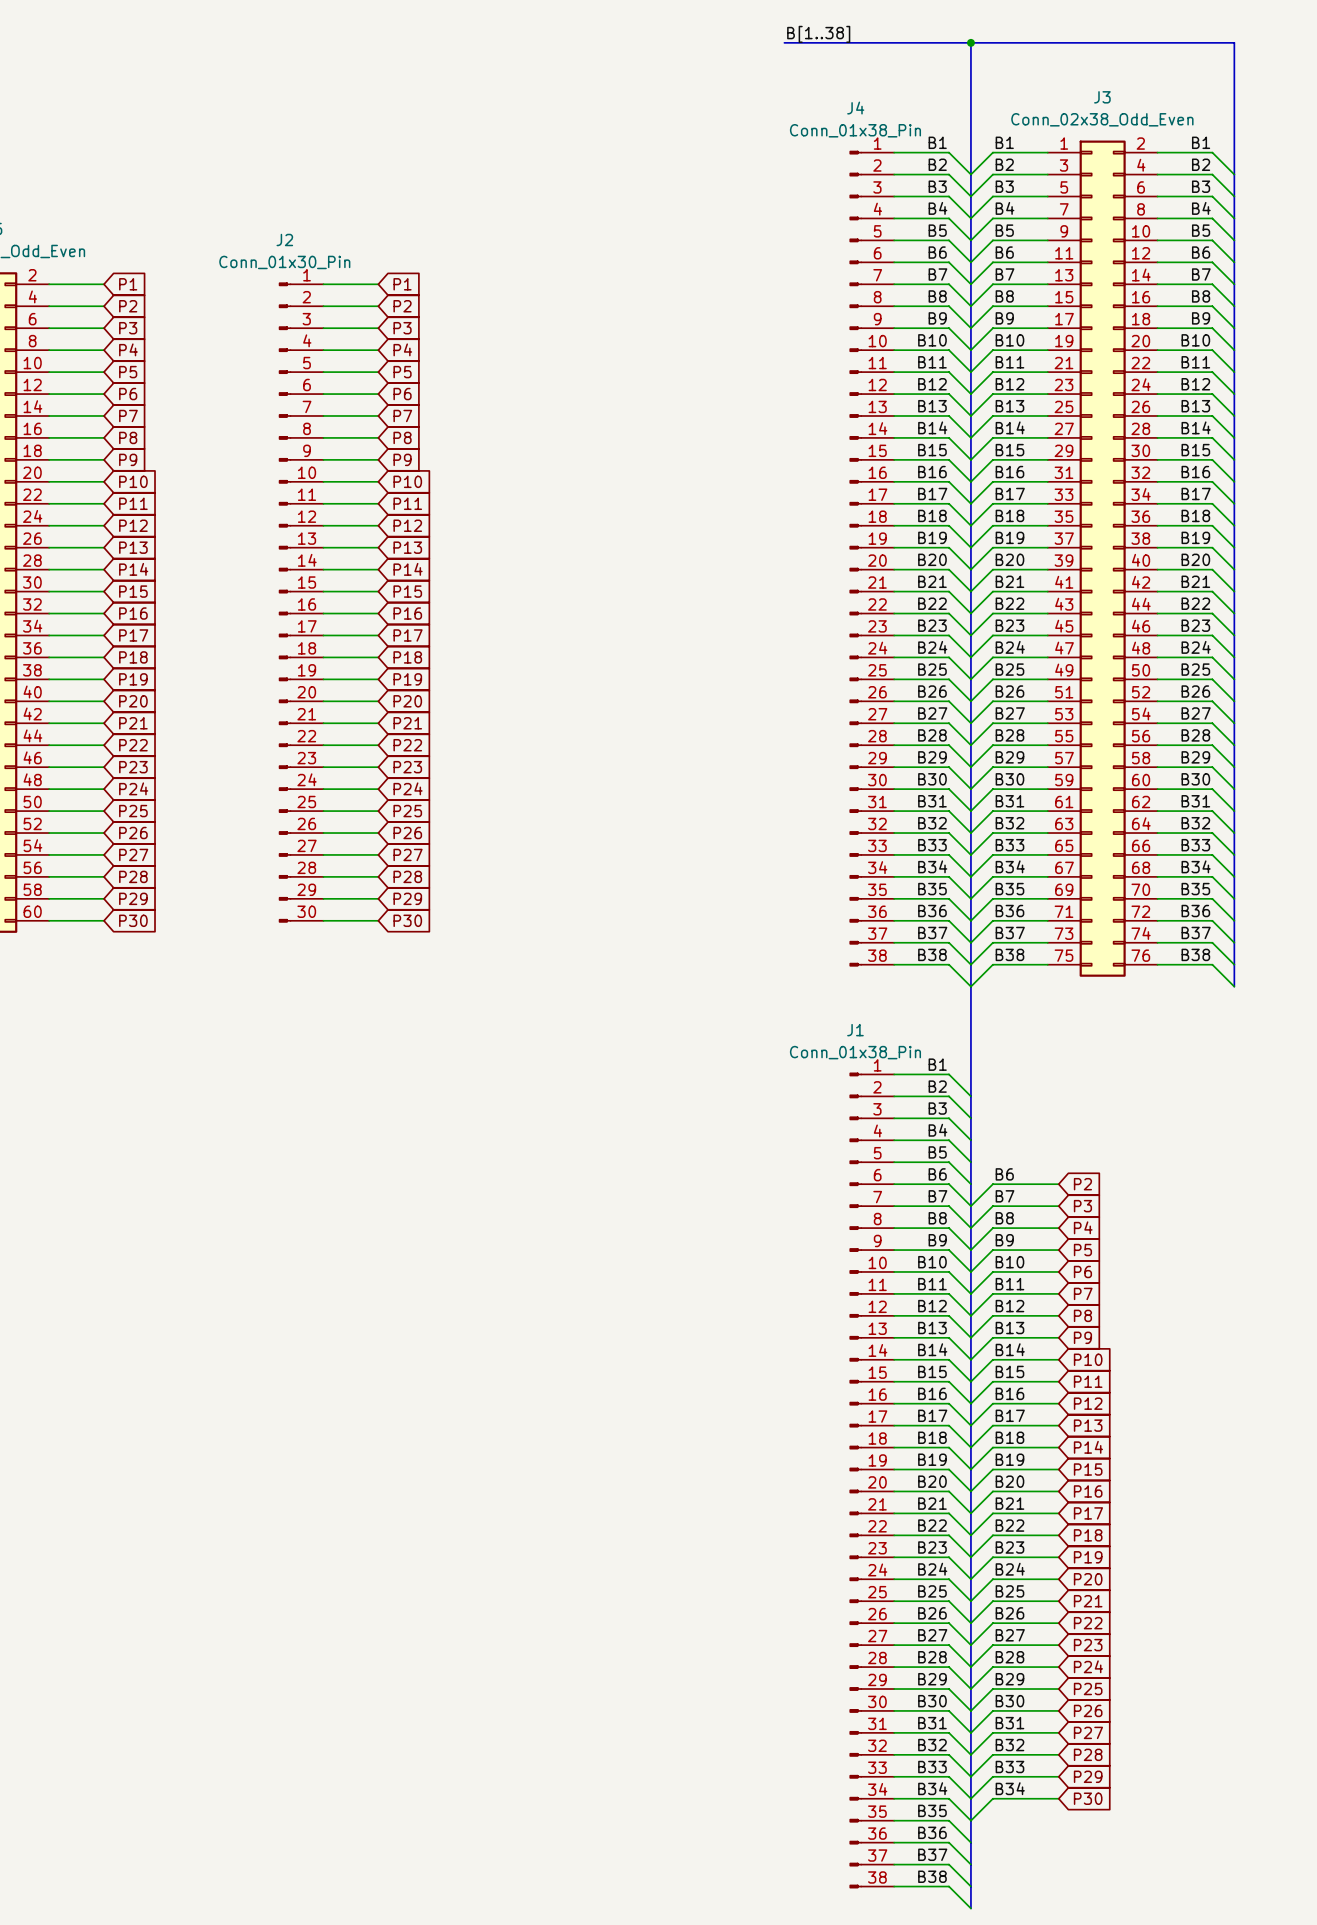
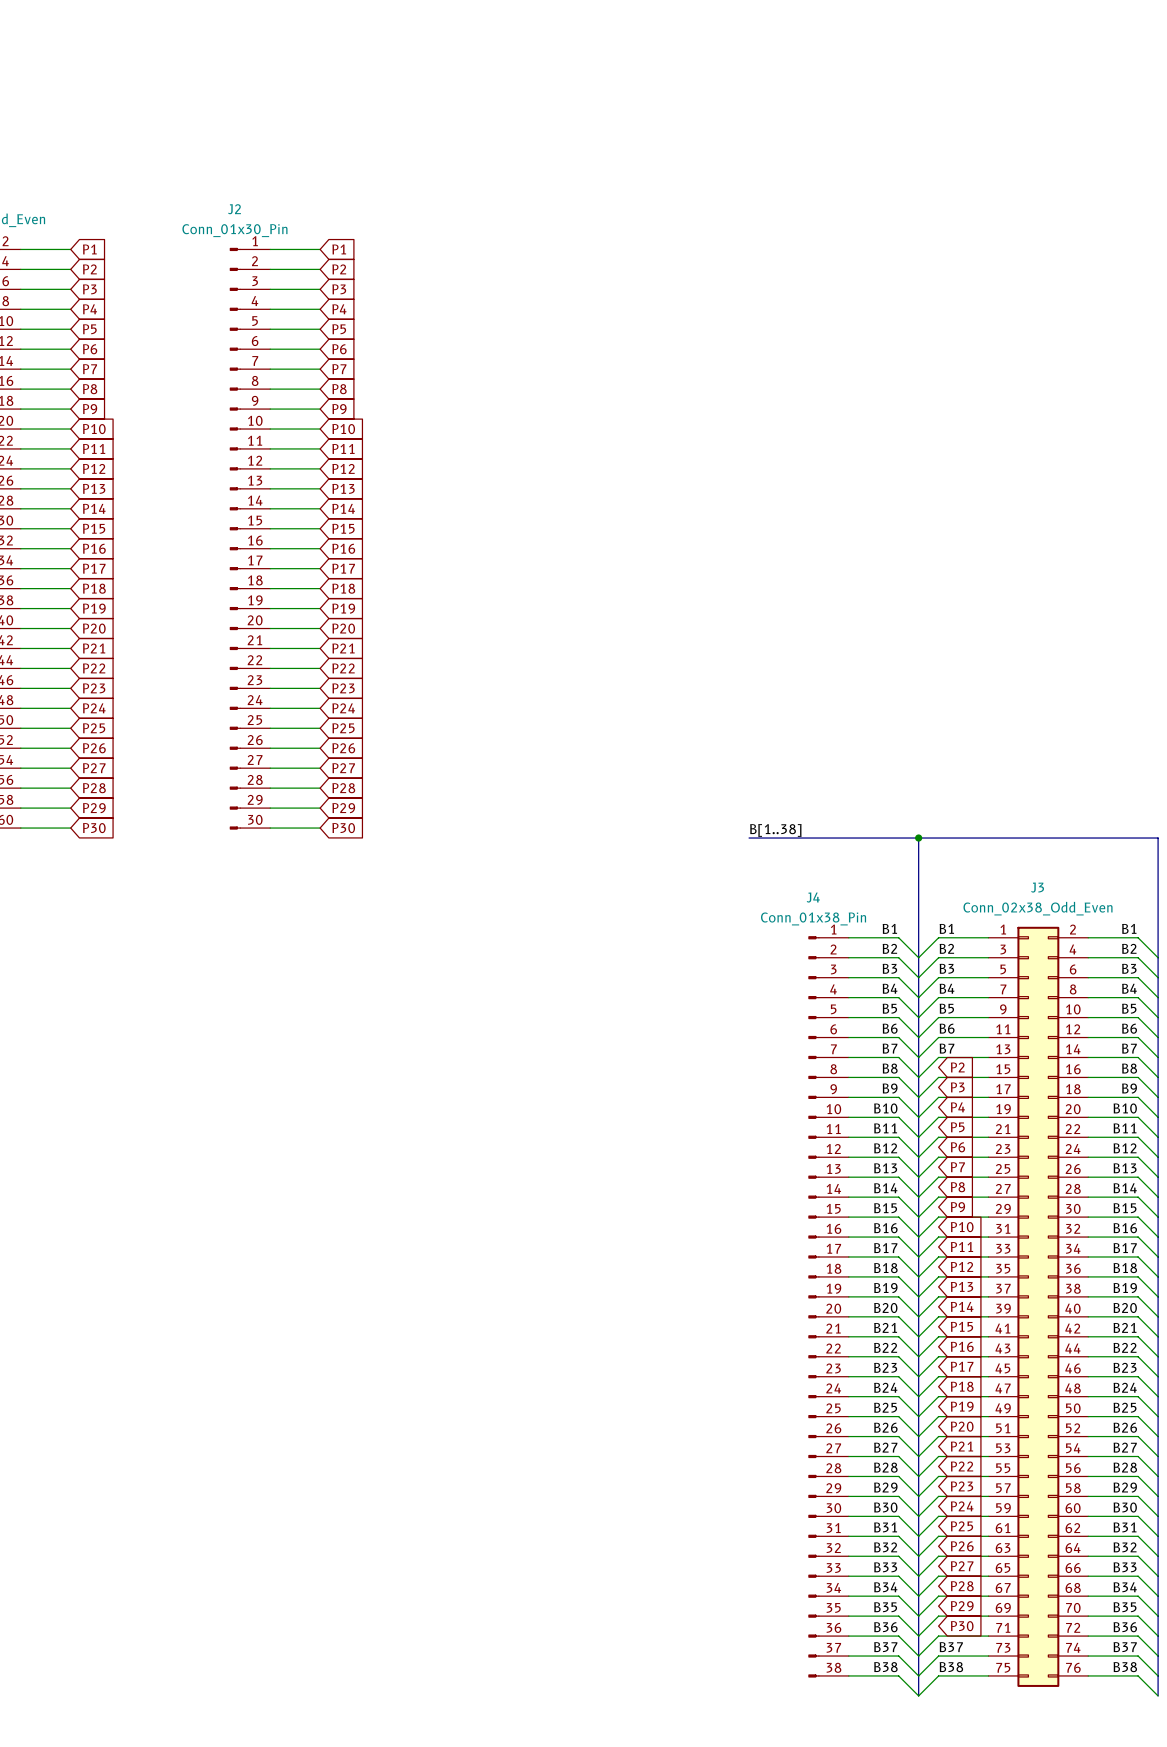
label: B[1..38] (818, 34) -> none
bus: (784, 42) (1234, 42) (1234, 986) -> none
bus: (970, 42) (970, 1908) -> none
junction: (970, 42) -> none
label: B1 (937, 142) -> none
label: B1 (1004, 142) -> none
label: B1 (1201, 142) -> none
wire: (894, 152) (949, 152) (970, 174) (992, 152) (1047, 152) -> none
wire: (1157, 152) (1212, 152) (1234, 174) -> none
label: B2 (937, 164) -> none
label: B2 (1004, 164) -> none
label: B2 (1201, 164) -> none
wire: (894, 174) (949, 174) (970, 196) (992, 174) (1047, 174) -> none
wire: (1157, 174) (1212, 174) (1234, 196) -> none
label: B3 (937, 186) -> none
label: B3 (1004, 186) -> none
label: B3 (1201, 186) -> none
wire: (894, 196) (949, 196) (970, 218) (992, 196) (1047, 196) -> none
wire: (1157, 196) (1212, 196) (1234, 218) -> none
label: B4 (937, 208) -> none
label: B4 (1005, 208) -> none
label: B4 (1201, 208) -> none
wire: (894, 218) (949, 218) (970, 240) (992, 218) (1047, 218) -> none
wire: (1157, 218) (1212, 218) (1234, 240) -> none
label: B5 (937, 230) -> none
label: B5 (1004, 230) -> none
label: B5 (1201, 230) -> none
wire: (894, 240) (949, 240) (970, 262) (992, 240) (1047, 240) -> none
wire: (1157, 240) (1212, 240) (1234, 262) -> none
label: B6 (937, 252) -> none
label: B6 (1004, 252) -> none
label: B6 (1201, 252) -> none
wire: (894, 262) (949, 262) (970, 284) (992, 262) (1047, 262) -> none
wire: (1157, 262) (1212, 262) (1234, 284) -> none
label: B7 (937, 274) -> none
label: B7 (1005, 274) -> none
label: B7 (1201, 274) -> none
wire: (894, 284) (949, 284) (970, 306) (992, 284) (1047, 284) -> none
wire: (1157, 284) (1212, 284) (1234, 306) -> none
label: B8 (937, 296) -> none
label: B8 (1004, 296) -> none
label: B8 (1201, 296) -> none
wire: (894, 306) (949, 306) (970, 328) (992, 306) (1047, 306) -> none
wire: (1157, 306) (1212, 306) (1234, 328) -> none
label: B9 (937, 318) -> none
label: B9 (1004, 318) -> none
label: B9 (1201, 318) -> none
wire: (894, 328) (949, 328) (970, 350) (992, 328) (1047, 328) -> none
wire: (1157, 328) (1212, 328) (1234, 350) -> none
label: B10 (932, 340) -> none
label: B10 (1009, 340) -> none
label: B10 (1195, 340) -> none
wire: (894, 350) (949, 350) (970, 372) (992, 350) (1047, 350) -> none
wire: (1157, 350) (1212, 350) (1234, 372) -> none
label: B11 (932, 362) -> none
label: B11 (1009, 362) -> none
label: B11 (1195, 362) -> none
wire: (894, 372) (949, 372) (970, 394) (992, 372) (1047, 372) -> none
wire: (1157, 372) (1212, 372) (1234, 394) -> none
label: B12 (932, 384) -> none
label: B12 (1009, 384) -> none
label: B12 (1195, 384) -> none
wire: (894, 394) (949, 394) (970, 415) (992, 394) (1047, 394) -> none
wire: (1157, 394) (1212, 394) (1234, 415) -> none
label: B13 (932, 406) -> none
label: B13 (1009, 406) -> none
label: B13 (1195, 406) -> none
wire: (894, 415) (949, 415) (970, 437) (992, 415) (1047, 415) -> none
wire: (1157, 415) (1212, 415) (1234, 437) -> none
label: B14 (932, 427) -> none
label: B14 (1010, 427) -> none
label: B14 (1196, 427) -> none
wire: (894, 437) (949, 437) (970, 459) (992, 437) (1047, 437) -> none
wire: (1157, 437) (1212, 437) (1234, 459) -> none
label: B15 (932, 450) -> none
label: B15 (1009, 450) -> none
label: B15 (1195, 450) -> none
wire: (894, 459) (949, 459) (970, 481) (992, 459) (1047, 459) -> none
wire: (1157, 459) (1212, 459) (1234, 481) -> none
label: B16 (932, 472) -> none
label: B16 (1009, 472) -> none
label: B16 (1195, 472) -> none
wire: (894, 481) (949, 481) (970, 503) (992, 481) (1047, 481) -> none
wire: (1157, 481) (1212, 481) (1234, 503) -> none
label: B17 (932, 493) -> none
label: B17 (1010, 493) -> none
label: B17 (1196, 493) -> none
wire: (894, 503) (949, 503) (970, 525) (992, 503) (1047, 503) -> none
wire: (1157, 503) (1212, 503) (1234, 525) -> none
label: B18 (932, 515) -> none
label: B18 (1009, 515) -> none
label: B18 (1195, 515) -> none
wire: (894, 525) (949, 525) (970, 547) (992, 525) (1047, 525) -> none
wire: (1157, 525) (1212, 525) (1234, 547) -> none
label: B19 (932, 537) -> none
label: B19 (1009, 537) -> none
label: B19 (1195, 537) -> none
wire: (894, 547) (949, 547) (970, 569) (992, 547) (1047, 547) -> none
wire: (1157, 547) (1212, 547) (1234, 569) -> none
J4 position: (871, 558) -> (828, 1306)
J3 position: (1102, 558) -> (1038, 1306)
label: B20 (932, 559) -> none
label: B20 (1009, 559) -> none
label: B20 (1195, 559) -> none
wire: (894, 569) (949, 569) (970, 591) (992, 569) (1047, 569) -> none
wire: (1157, 569) (1212, 569) (1234, 591) -> none
label: B21 (932, 581) -> none
label: B21 (1009, 581) -> none
label: B21 (1195, 581) -> none
wire: (894, 591) (949, 591) (970, 613) (992, 591) (1047, 591) -> none
wire: (1157, 591) (1212, 591) (1234, 613) -> none
label: B22 (932, 603) -> none
label: B22 (1009, 603) -> none
label: B22 (1195, 603) -> none
wire: (894, 613) (949, 613) (970, 635) (992, 613) (1047, 613) -> none
wire: (1157, 613) (1212, 613) (1234, 635) -> none
label: B23 (932, 625) -> none
label: B23 (1009, 625) -> none
label: B23 (1195, 625) -> none
wire: (894, 635) (949, 635) (970, 657) (992, 635) (1047, 635) -> none
wire: (1157, 635) (1212, 635) (1234, 657) -> none
label: B24 (932, 647) -> none
label: B24 (1010, 647) -> none
label: B24 (1196, 647) -> none
wire: (894, 657) (949, 657) (970, 679) (992, 657) (1047, 657) -> none
wire: (1157, 657) (1212, 657) (1234, 679) -> none
label: B25 (932, 669) -> none
label: B25 (1009, 669) -> none
label: B25 (1195, 669) -> none
wire: (894, 679) (949, 679) (970, 701) (992, 679) (1047, 679) -> none
wire: (1157, 679) (1212, 679) (1234, 701) -> none
label: B26 (932, 691) -> none
label: B26 (1009, 691) -> none
label: B26 (1195, 691) -> none
wire: (894, 701) (949, 701) (970, 723) (992, 701) (1047, 701) -> none
wire: (1157, 701) (1212, 701) (1234, 723) -> none
label: B27 (932, 713) -> none
label: B27 (1010, 713) -> none
label: B27 (1196, 713) -> none
wire: (894, 723) (949, 723) (970, 745) (992, 723) (1047, 723) -> none
wire: (1157, 723) (1212, 723) (1234, 745) -> none
label: B28 (932, 735) -> none
label: B28 (1009, 735) -> none
label: B28 (1195, 735) -> none
wire: (894, 745) (949, 745) (970, 767) (992, 745) (1047, 745) -> none
wire: (1157, 745) (1212, 745) (1234, 767) -> none
label: B29 (932, 757) -> none
label: B29 (1009, 757) -> none
label: B29 (1195, 757) -> none
wire: (894, 767) (949, 767) (970, 789) (992, 767) (1047, 767) -> none
wire: (1157, 767) (1212, 767) (1234, 789) -> none
label: B30 (932, 779) -> none
label: B30 (1009, 779) -> none
label: B30 (1195, 779) -> none
wire: (894, 789) (949, 789) (970, 811) (992, 789) (1047, 789) -> none
wire: (1157, 789) (1212, 789) (1234, 811) -> none
label: B31 (932, 801) -> none
label: B31 (1009, 801) -> none
label: B31 (1195, 801) -> none
wire: (894, 811) (949, 811) (970, 833) (992, 811) (1047, 811) -> none
wire: (1157, 811) (1212, 811) (1234, 833) -> none
label: B32 (932, 823) -> none
label: B32 (1009, 823) -> none
label: B32 (1195, 823) -> none
wire: (894, 833) (949, 833) (970, 854) (992, 833) (1047, 833) -> none
wire: (1157, 833) (1212, 833) (1234, 854) -> none
label: B33 (932, 845) -> none
label: B33 (1009, 845) -> none
label: B33 (1195, 845) -> none
wire: (894, 854) (949, 854) (970, 876) (992, 854) (1047, 854) -> (848, 937) (898, 937) (918, 957) (938, 937) (988, 937)
wire: (1157, 854) (1212, 854) (1234, 876) -> (1088, 937) (1138, 937) (1158, 957)
label: B34 (932, 866) -> none
label: B34 (1010, 866) -> none
label: B34 (1196, 866) -> none
wire: (894, 876) (949, 876) (970, 898) (992, 876) (1047, 876) -> (848, 957) (898, 957) (918, 977) (938, 957) (988, 957)
wire: (1157, 876) (1212, 876) (1234, 898) -> (1088, 957) (1138, 957) (1158, 977)
label: B35 (932, 889) -> none
label: B35 (1009, 889) -> none
label: B35 (1195, 889) -> none
wire: (894, 898) (949, 898) (970, 920) (992, 898) (1047, 898) -> (848, 977) (898, 977) (918, 997) (938, 977) (988, 977)
wire: (1157, 898) (1212, 898) (1234, 920) -> (1088, 977) (1138, 977) (1158, 997)
label: B36 (932, 911) -> none
label: B36 (1009, 911) -> none
label: B36 (1195, 911) -> none
wire: (894, 920) (949, 920) (970, 942) (992, 920) (1047, 920) -> (848, 997) (898, 997) (918, 1017) (938, 997) (988, 997)
wire: (1157, 920) (1212, 920) (1234, 942) -> (1088, 997) (1138, 997) (1158, 1017)
label: none -> B[1..38] (775, 830)
bus: none -> (749, 838) (1158, 838) (1158, 1695)
bus: none -> (918, 838) (918, 1695)
junction: none -> (918, 838)
label: B37 (932, 932) -> none
label: B37 (1010, 932) -> none
label: B37 (1196, 932) -> none
wire: (894, 942) (949, 942) (970, 964) (992, 942) (1047, 942) -> (848, 1017) (898, 1017) (918, 1037) (938, 1017) (988, 1017)
wire: (1157, 942) (1212, 942) (1234, 964) -> (1088, 1017) (1138, 1017) (1158, 1037)
label: B38 (932, 954) -> none
label: B38 (1009, 954) -> none
label: B38 (1195, 954) -> none
wire: (894, 964) (949, 964) (970, 986) (992, 964) (1047, 964) -> (848, 1037) (898, 1037) (918, 1057) (938, 1037) (988, 1037)
wire: (1157, 964) (1212, 964) (1234, 986) -> (1088, 1037) (1138, 1037) (1158, 1057)
label: none -> B1 (889, 928)
label: none -> B1 (946, 928)
label: none -> B1 (1129, 928)
label: none -> B2 (889, 948)
label: none -> B2 (946, 948)
label: none -> B2 (1129, 948)
label: B1 (937, 1064) -> none
wire: (894, 1074) (949, 1074) (970, 1096) -> none
label: none -> B3 (889, 968)
label: none -> B3 (946, 968)
label: none -> B3 (1129, 968)
label: B2 (937, 1086) -> none
wire: (894, 1096) (949, 1096) (970, 1118) -> none
label: none -> B4 (890, 988)
label: none -> B4 (947, 988)
label: none -> B4 (1129, 988)
label: B3 (937, 1108) -> none
wire: (894, 1118) (949, 1118) (970, 1140) -> none
label: none -> B5 (889, 1008)
label: none -> B5 (946, 1008)
label: none -> B5 (1129, 1008)
label: B4 (937, 1130) -> none
wire: (894, 1140) (949, 1140) (970, 1162) -> none
label: none -> B6 (890, 1028)
label: none -> B6 (947, 1028)
label: none -> B6 (1129, 1028)
label: B5 (937, 1152) -> none
wire: (894, 1162) (949, 1162) (970, 1184) -> none
label: none -> B7 (890, 1048)
label: none -> B7 (947, 1048)
label: none -> B7 (1129, 1048)
wire: none -> (848, 1057) (898, 1057) (918, 1077) (938, 1057) (988, 1057)
wire: none -> (1088, 1057) (1138, 1057) (1158, 1077)
label: B6 (937, 1174) -> none
label: B6 (1004, 1174) -> none
wire: (894, 1184) (949, 1184) (970, 1206) (992, 1184) (1058, 1184) -> none
label: none -> B8 (890, 1068)
label: none -> B8 (1129, 1068)
wire: none -> (848, 1077) (898, 1077) (918, 1097) (938, 1077) (988, 1077)
wire: none -> (1088, 1077) (1138, 1077) (1158, 1097)
label: B7 (937, 1196) -> none
label: B7 (1005, 1196) -> none
wire: (894, 1206) (949, 1206) (970, 1228) (992, 1206) (1058, 1206) -> none
label: none -> B9 (890, 1088)
label: none -> B9 (1129, 1088)
wire: none -> (848, 1097) (898, 1097) (918, 1117) (938, 1097) (988, 1097)
wire: none -> (1088, 1097) (1138, 1097) (1158, 1117)
label: B8 (937, 1218) -> none
label: B8 (1004, 1218) -> none
wire: (894, 1228) (949, 1228) (970, 1250) (992, 1228) (1058, 1228) -> none
label: none -> B10 (885, 1108)
label: none -> B10 (1125, 1108)
wire: none -> (848, 1117) (898, 1117) (918, 1137) (938, 1117) (988, 1117)
wire: none -> (1088, 1117) (1138, 1117) (1158, 1137)
label: B9 (937, 1240) -> none
label: B9 (1004, 1240) -> none
wire: (894, 1250) (949, 1250) (970, 1271) (992, 1250) (1058, 1250) -> none
label: none -> B11 (885, 1128)
label: none -> B11 (1125, 1128)
wire: none -> (848, 1137) (898, 1137) (918, 1157) (938, 1137) (988, 1137)
wire: none -> (1088, 1137) (1138, 1137) (1158, 1157)
label: B10 (932, 1262) -> none
label: B10 (1009, 1262) -> none
wire: (894, 1271) (949, 1271) (970, 1293) (992, 1271) (1058, 1271) -> none
label: none -> B12 (885, 1148)
label: none -> B12 (1125, 1148)
wire: none -> (848, 1157) (898, 1157) (918, 1177) (938, 1157) (988, 1157)
wire: none -> (1088, 1157) (1138, 1157) (1158, 1177)
label: B11 (932, 1284) -> none
label: B11 (1009, 1284) -> none
wire: (894, 1293) (949, 1293) (970, 1315) (992, 1293) (1058, 1293) -> none
label: none -> B13 (885, 1168)
label: none -> B13 (1125, 1168)
wire: none -> (848, 1177) (898, 1177) (918, 1197) (938, 1177) (988, 1177)
wire: none -> (1088, 1177) (1138, 1177) (1158, 1197)
label: B12 (932, 1306) -> none
label: B12 (1009, 1306) -> none
wire: (894, 1315) (949, 1315) (970, 1337) (992, 1315) (1058, 1315) -> none
label: none -> B14 (885, 1188)
label: none -> B14 (1125, 1188)
wire: none -> (848, 1197) (898, 1197) (918, 1217) (938, 1197) (988, 1197)
wire: none -> (1088, 1197) (1138, 1197) (1158, 1217)
label: B13 (932, 1328) -> none
label: B13 (1009, 1328) -> none
wire: (894, 1337) (949, 1337) (970, 1359) (992, 1337) (1058, 1337) -> none
label: none -> B15 (885, 1208)
label: none -> B15 (1125, 1208)
wire: none -> (848, 1217) (898, 1217) (918, 1237) (938, 1217) (988, 1217)
wire: none -> (1088, 1217) (1138, 1217) (1158, 1237)
label: B14 (932, 1349) -> none
label: B14 (1010, 1349) -> none
wire: (894, 1359) (949, 1359) (970, 1381) (992, 1359) (1058, 1359) -> none
label: none -> B16 (885, 1228)
label: none -> B16 (1125, 1228)
wire: none -> (848, 1237) (898, 1237) (918, 1256) (938, 1237) (988, 1237)
wire: none -> (1088, 1237) (1138, 1237) (1158, 1256)
label: B15 (932, 1371) -> none
label: B15 (1009, 1371) -> none
wire: (894, 1381) (949, 1381) (970, 1403) (992, 1381) (1058, 1381) -> none
label: none -> B17 (885, 1248)
label: none -> B17 (1125, 1248)
wire: none -> (848, 1256) (898, 1256) (918, 1276) (938, 1256) (988, 1256)
wire: none -> (1088, 1256) (1138, 1256) (1158, 1276)
label: B16 (932, 1393) -> none
label: B16 (1009, 1393) -> none
wire: (894, 1403) (949, 1403) (970, 1425) (992, 1403) (1058, 1403) -> none
label: none -> B18 (885, 1268)
label: none -> B18 (1125, 1268)
wire: none -> (848, 1276) (898, 1276) (918, 1296) (938, 1276) (988, 1276)
wire: none -> (1088, 1276) (1138, 1276) (1158, 1296)
label: B17 (932, 1415) -> none
label: B17 (1010, 1415) -> none
wire: (894, 1425) (949, 1425) (970, 1447) (992, 1425) (1058, 1425) -> none
label: none -> B19 (885, 1288)
label: none -> B19 (1125, 1288)
wire: none -> (848, 1296) (898, 1296) (918, 1316) (938, 1296) (988, 1296)
wire: none -> (1088, 1296) (1138, 1296) (1158, 1316)
label: B18 (932, 1437) -> none
label: B18 (1009, 1437) -> none
wire: (894, 1447) (949, 1447) (970, 1469) (992, 1447) (1058, 1447) -> none
label: none -> B20 (885, 1308)
label: none -> B20 (1125, 1308)
wire: none -> (848, 1316) (898, 1316) (918, 1336) (938, 1316) (988, 1316)
wire: none -> (1088, 1316) (1138, 1316) (1158, 1336)
label: B19 (932, 1459) -> none
label: B19 (1009, 1459) -> none
wire: (894, 1469) (949, 1469) (970, 1491) (992, 1469) (1058, 1469) -> none
label: none -> B21 (885, 1327)
label: none -> B21 (1125, 1327)
J1: Conn_01x38_Pin (871, 1480) -> none
wire: none -> (848, 1336) (898, 1336) (918, 1356) (938, 1336) (988, 1336)
wire: none -> (1088, 1336) (1138, 1336) (1158, 1356)
label: B20 (932, 1481) -> none
label: B20 (1009, 1481) -> none
wire: (894, 1491) (949, 1491) (970, 1513) (992, 1491) (1058, 1491) -> none
label: none -> B22 (885, 1347)
label: none -> B22 (1125, 1347)
wire: none -> (848, 1356) (898, 1356) (918, 1376) (938, 1356) (988, 1356)
wire: none -> (1088, 1356) (1138, 1356) (1158, 1376)
label: B21 (932, 1503) -> none
label: B21 (1009, 1503) -> none
wire: (894, 1513) (949, 1513) (970, 1535) (992, 1513) (1058, 1513) -> none
label: none -> B23 (885, 1367)
label: none -> B23 (1125, 1367)
wire: none -> (848, 1376) (898, 1376) (918, 1396) (938, 1376) (988, 1376)
wire: none -> (1088, 1376) (1138, 1376) (1158, 1396)
label: B22 (932, 1525) -> none
label: B22 (1009, 1525) -> none
wire: (894, 1535) (949, 1535) (970, 1557) (992, 1535) (1058, 1535) -> none
label: none -> B24 (885, 1387)
label: none -> B24 (1125, 1387)
wire: none -> (848, 1396) (898, 1396) (918, 1416) (938, 1396) (988, 1396)
wire: none -> (1088, 1396) (1138, 1396) (1158, 1416)
label: B23 (932, 1547) -> none
label: B23 (1009, 1547) -> none
wire: (894, 1557) (949, 1557) (970, 1579) (992, 1557) (1058, 1557) -> none
label: none -> B25 (885, 1407)
label: none -> B25 (1125, 1407)
wire: none -> (848, 1416) (898, 1416) (918, 1436) (938, 1416) (988, 1416)
wire: none -> (1088, 1416) (1138, 1416) (1158, 1436)
label: B24 (932, 1569) -> none
label: B24 (1010, 1569) -> none
wire: (894, 1579) (949, 1579) (970, 1601) (992, 1579) (1058, 1579) -> none
label: none -> B26 (885, 1427)
label: none -> B26 (1125, 1427)
wire: none -> (848, 1436) (898, 1436) (918, 1456) (938, 1436) (988, 1436)
wire: none -> (1088, 1436) (1138, 1436) (1158, 1456)
label: B25 (932, 1591) -> none
label: B25 (1009, 1591) -> none
wire: (894, 1601) (949, 1601) (970, 1623) (992, 1601) (1058, 1601) -> none
label: none -> B27 (885, 1447)
label: none -> B27 (1125, 1447)
wire: none -> (848, 1456) (898, 1456) (918, 1476) (938, 1456) (988, 1456)
wire: none -> (1088, 1456) (1138, 1456) (1158, 1476)
label: B26 (932, 1613) -> none
label: B26 (1009, 1613) -> none
wire: (894, 1623) (949, 1623) (970, 1645) (992, 1623) (1058, 1623) -> none
label: none -> B28 (885, 1467)
label: none -> B28 (1125, 1467)
wire: none -> (848, 1476) (898, 1476) (918, 1496) (938, 1476) (988, 1476)
wire: none -> (1088, 1476) (1138, 1476) (1158, 1496)
label: B27 (932, 1635) -> none
label: B27 (1010, 1635) -> none
wire: (894, 1645) (949, 1645) (970, 1667) (992, 1645) (1058, 1645) -> none
label: none -> B29 (885, 1487)
label: none -> B29 (1125, 1487)
wire: none -> (848, 1496) (898, 1496) (918, 1516) (938, 1496) (988, 1496)
wire: none -> (1088, 1496) (1138, 1496) (1158, 1516)
label: B28 (932, 1657) -> none
label: B28 (1009, 1657) -> none
wire: (894, 1667) (949, 1667) (970, 1689) (992, 1667) (1058, 1667) -> none
label: none -> B30 (885, 1507)
label: none -> B30 (1125, 1507)
wire: none -> (848, 1516) (898, 1516) (918, 1536) (938, 1516) (988, 1516)
wire: none -> (1088, 1516) (1138, 1516) (1158, 1536)
label: B29 (932, 1679) -> none
label: B29 (1009, 1679) -> none
wire: (894, 1689) (949, 1689) (970, 1710) (992, 1689) (1058, 1689) -> none
label: none -> B31 (885, 1527)
label: none -> B31 (1125, 1527)
wire: none -> (848, 1536) (898, 1536) (918, 1556) (938, 1536) (988, 1536)
wire: none -> (1088, 1536) (1138, 1536) (1158, 1556)
label: B30 (932, 1701) -> none
label: B30 (1009, 1701) -> none
wire: (894, 1710) (949, 1710) (970, 1732) (992, 1710) (1058, 1710) -> none
label: none -> B32 (885, 1547)
label: none -> B32 (1125, 1547)
wire: none -> (848, 1556) (898, 1556) (918, 1576) (938, 1556) (988, 1556)
wire: none -> (1088, 1556) (1138, 1556) (1158, 1576)
label: B31 (932, 1723) -> none
label: B31 (1009, 1723) -> none
wire: (894, 1732) (949, 1732) (970, 1754) (992, 1732) (1058, 1732) -> none
label: none -> B33 (885, 1567)
label: none -> B33 (1125, 1567)
wire: none -> (848, 1576) (898, 1576) (918, 1596) (938, 1576) (988, 1576)
wire: none -> (1088, 1576) (1138, 1576) (1158, 1596)
label: B32 (932, 1745) -> none
label: B32 (1009, 1745) -> none
wire: (894, 1754) (949, 1754) (970, 1776) (992, 1754) (1058, 1754) -> none
label: none -> B34 (885, 1587)
label: none -> B34 (1125, 1587)
wire: none -> (848, 1596) (898, 1596) (918, 1616) (938, 1596) (988, 1596)
wire: none -> (1088, 1596) (1138, 1596) (1158, 1616)
label: B33 (932, 1767) -> none
label: B33 (1009, 1767) -> none
wire: (894, 1776) (949, 1776) (970, 1798) (992, 1776) (1058, 1776) -> none
label: none -> B35 (1125, 1607)
wire: none -> (848, 1616) (898, 1616) (918, 1636) (938, 1616) (988, 1616)
wire: none -> (1088, 1616) (1138, 1616) (1158, 1636)
label: B34 (932, 1788) -> none
label: B34 (1010, 1788) -> none
wire: (894, 1798) (949, 1798) (970, 1820) (992, 1798) (1058, 1798) -> none
label: none -> B36 (1125, 1627)
wire: none -> (848, 1636) (898, 1636) (918, 1656) (938, 1636) (988, 1636)
wire: none -> (1088, 1636) (1138, 1636) (1158, 1656)
label position: B35 (932, 1810) -> B35 (885, 1607)
wire: (894, 1820) (949, 1820) (970, 1842) -> none
label: none -> B37 (885, 1647)
label: none -> B37 (951, 1647)
label: none -> B37 (1125, 1647)
wire: none -> (848, 1656) (898, 1656) (918, 1675) (938, 1656) (988, 1656)
wire: none -> (1088, 1656) (1138, 1656) (1158, 1675)
label position: B36 (932, 1832) -> B36 (885, 1627)
wire: (894, 1842) (949, 1842) (970, 1864) -> none
label: none -> B38 (885, 1667)
label: none -> B38 (951, 1667)
label: none -> B38 (1125, 1667)
wire: none -> (848, 1675) (898, 1675) (918, 1695) (938, 1675) (988, 1675)
wire: none -> (1088, 1675) (1138, 1675) (1158, 1695)
label: B37 (932, 1854) -> none
wire: (894, 1864) (949, 1864) (970, 1886) -> none
label: B38 (932, 1876) -> none
wire: (894, 1886) (949, 1886) (970, 1908) -> none

